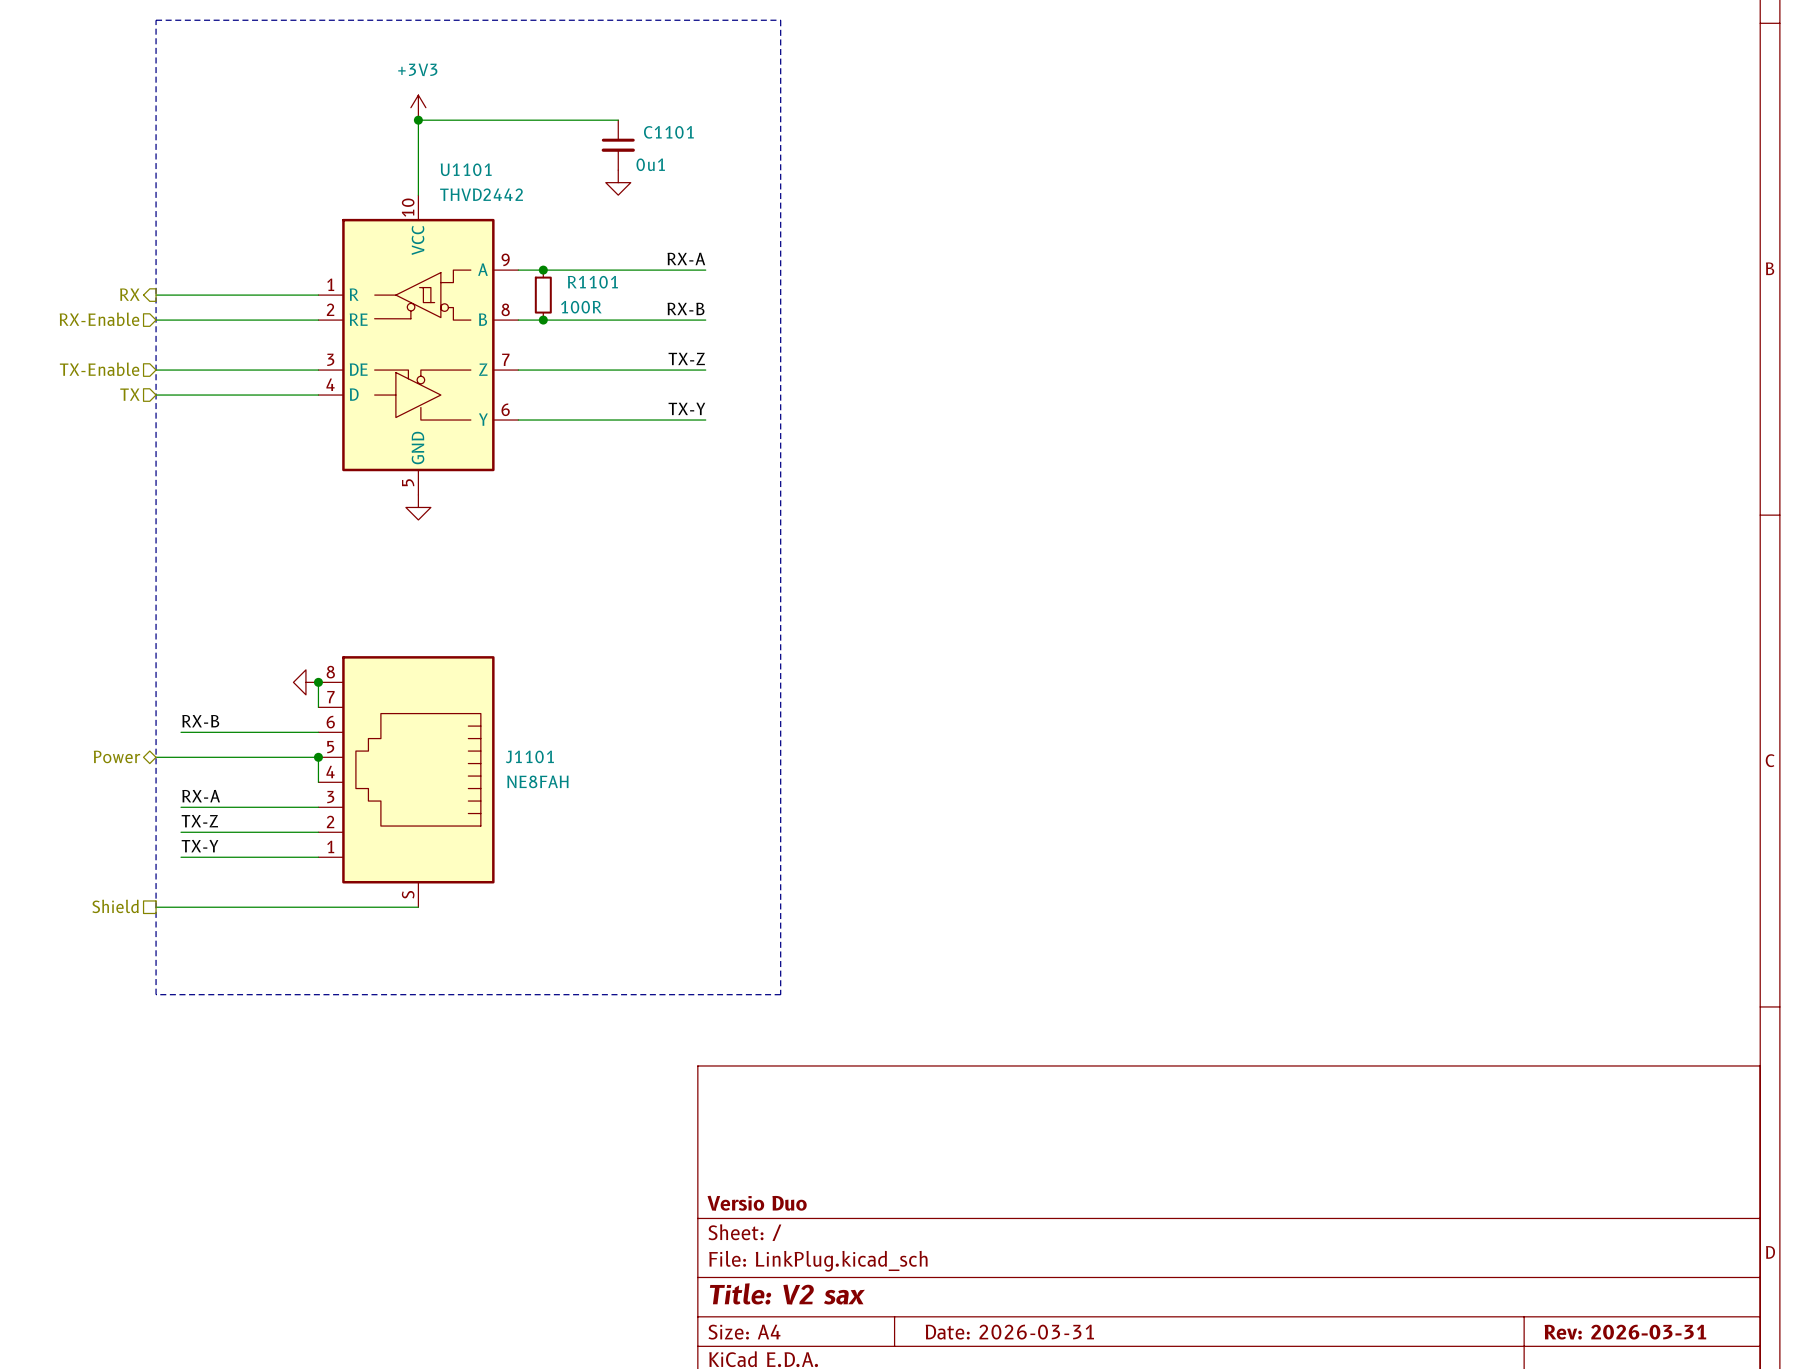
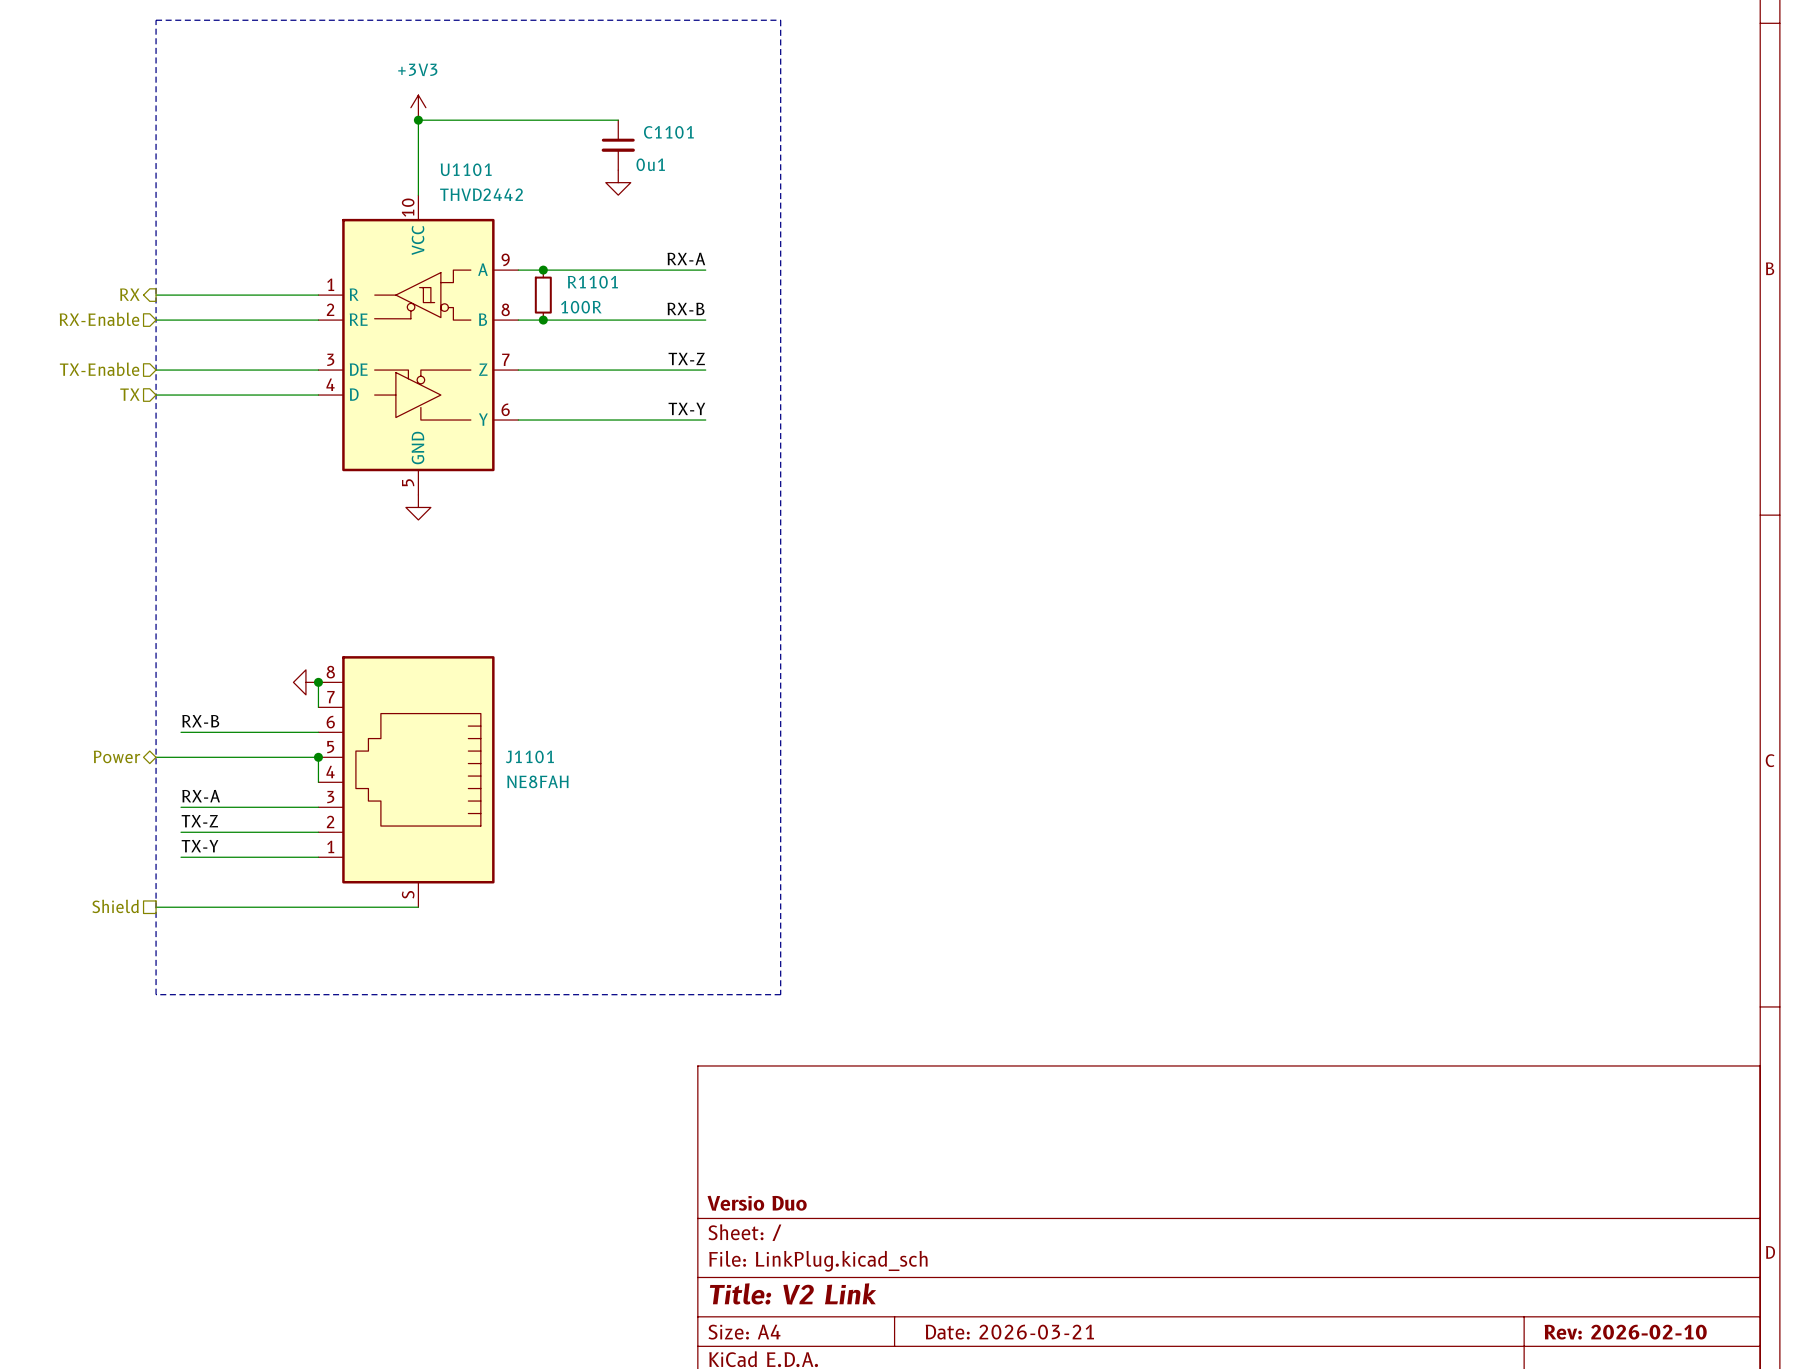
title block: Title: V2 sax (787, 1293) -> Title: V2 Link (793, 1293)
title block: Date: 2026-03-31 (1009, 1332) -> Date: 2026-03-21 (1009, 1332)
title block: Rev: 2026-03-31 (1625, 1332) -> Rev: 2026-02-10 (1625, 1332)

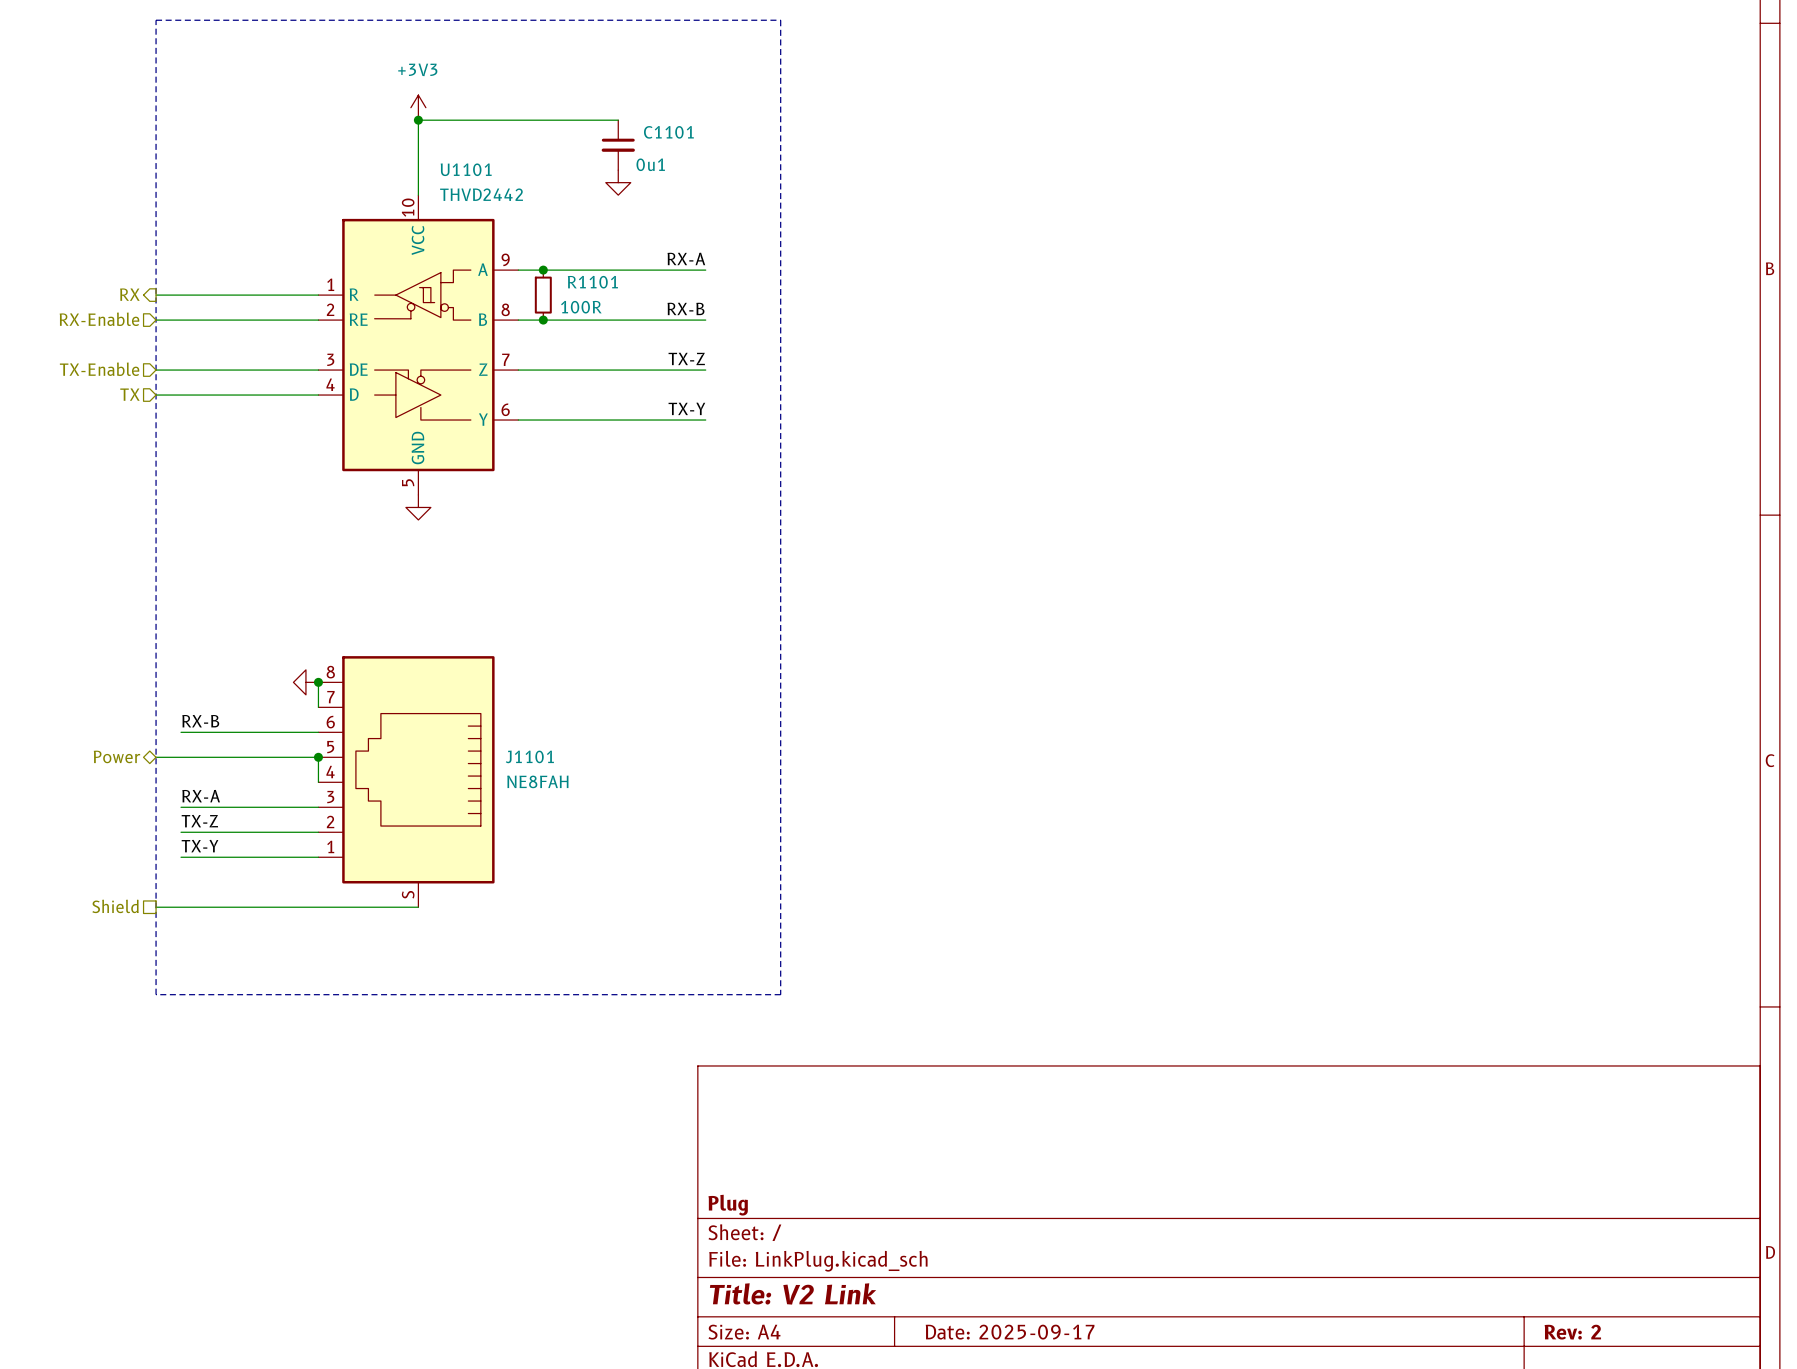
title block: Versio Duo (757, 1203) -> Plug (728, 1205)
title block: Date: 2026-03-21 (1009, 1332) -> Date: 2025-09-17 (1010, 1332)
title block: Rev: 2026-02-10 (1625, 1332) -> Rev: 2 (1572, 1332)

